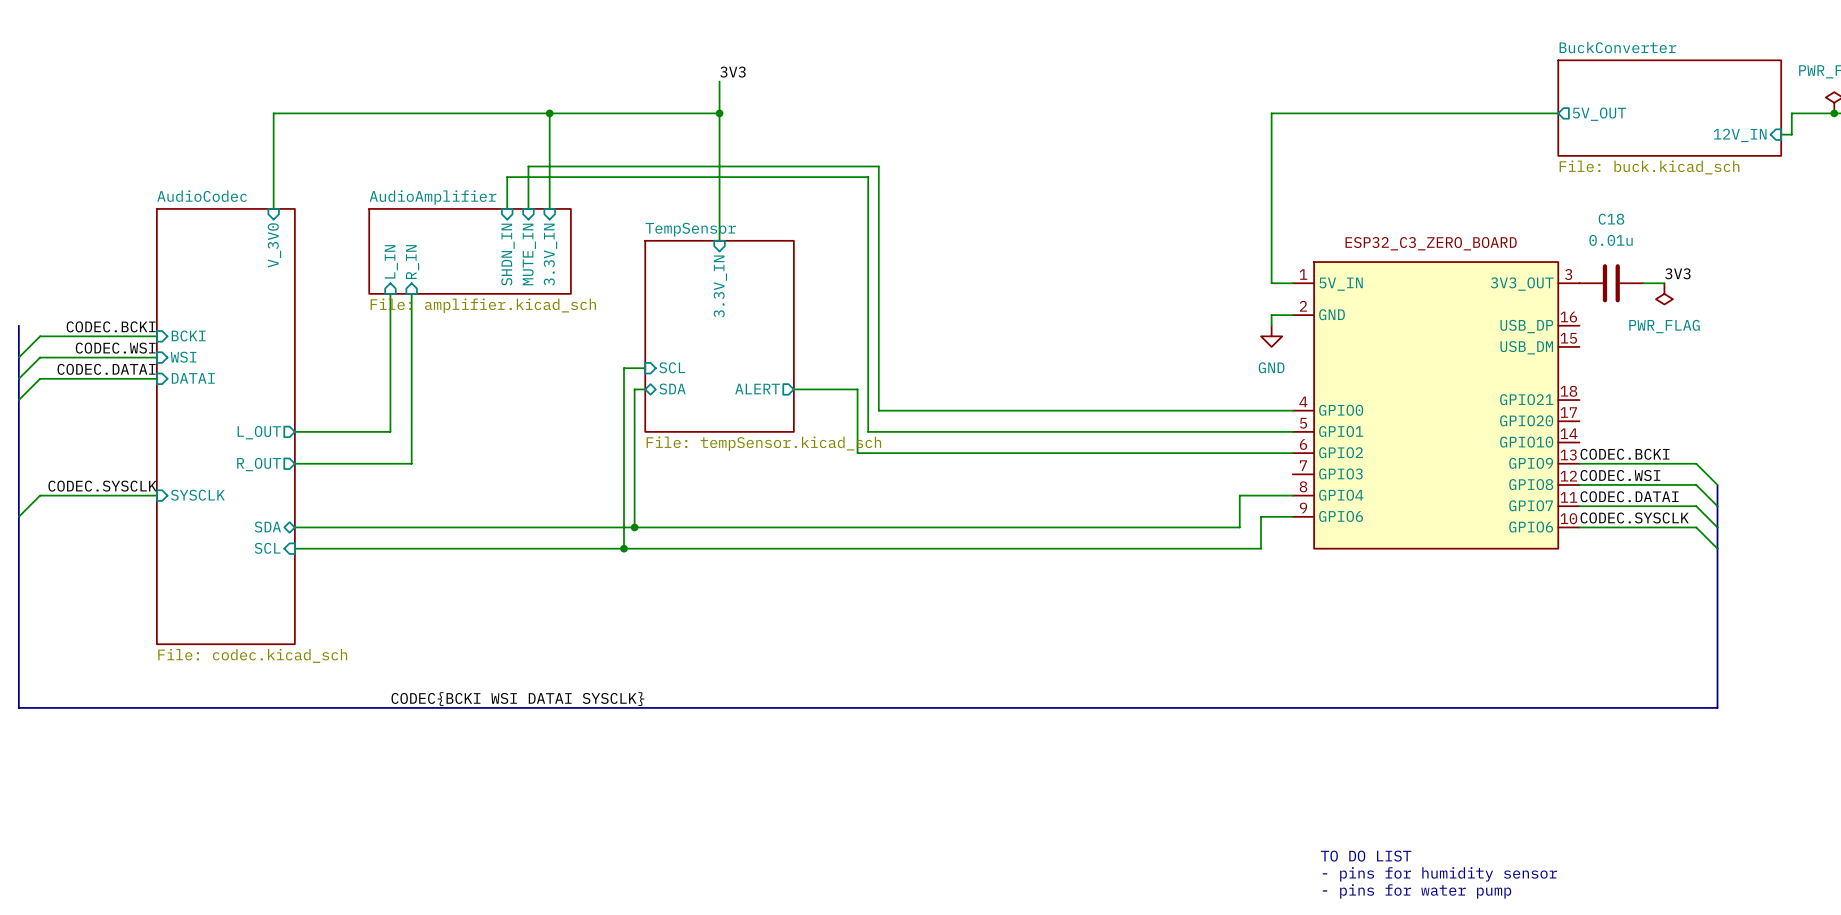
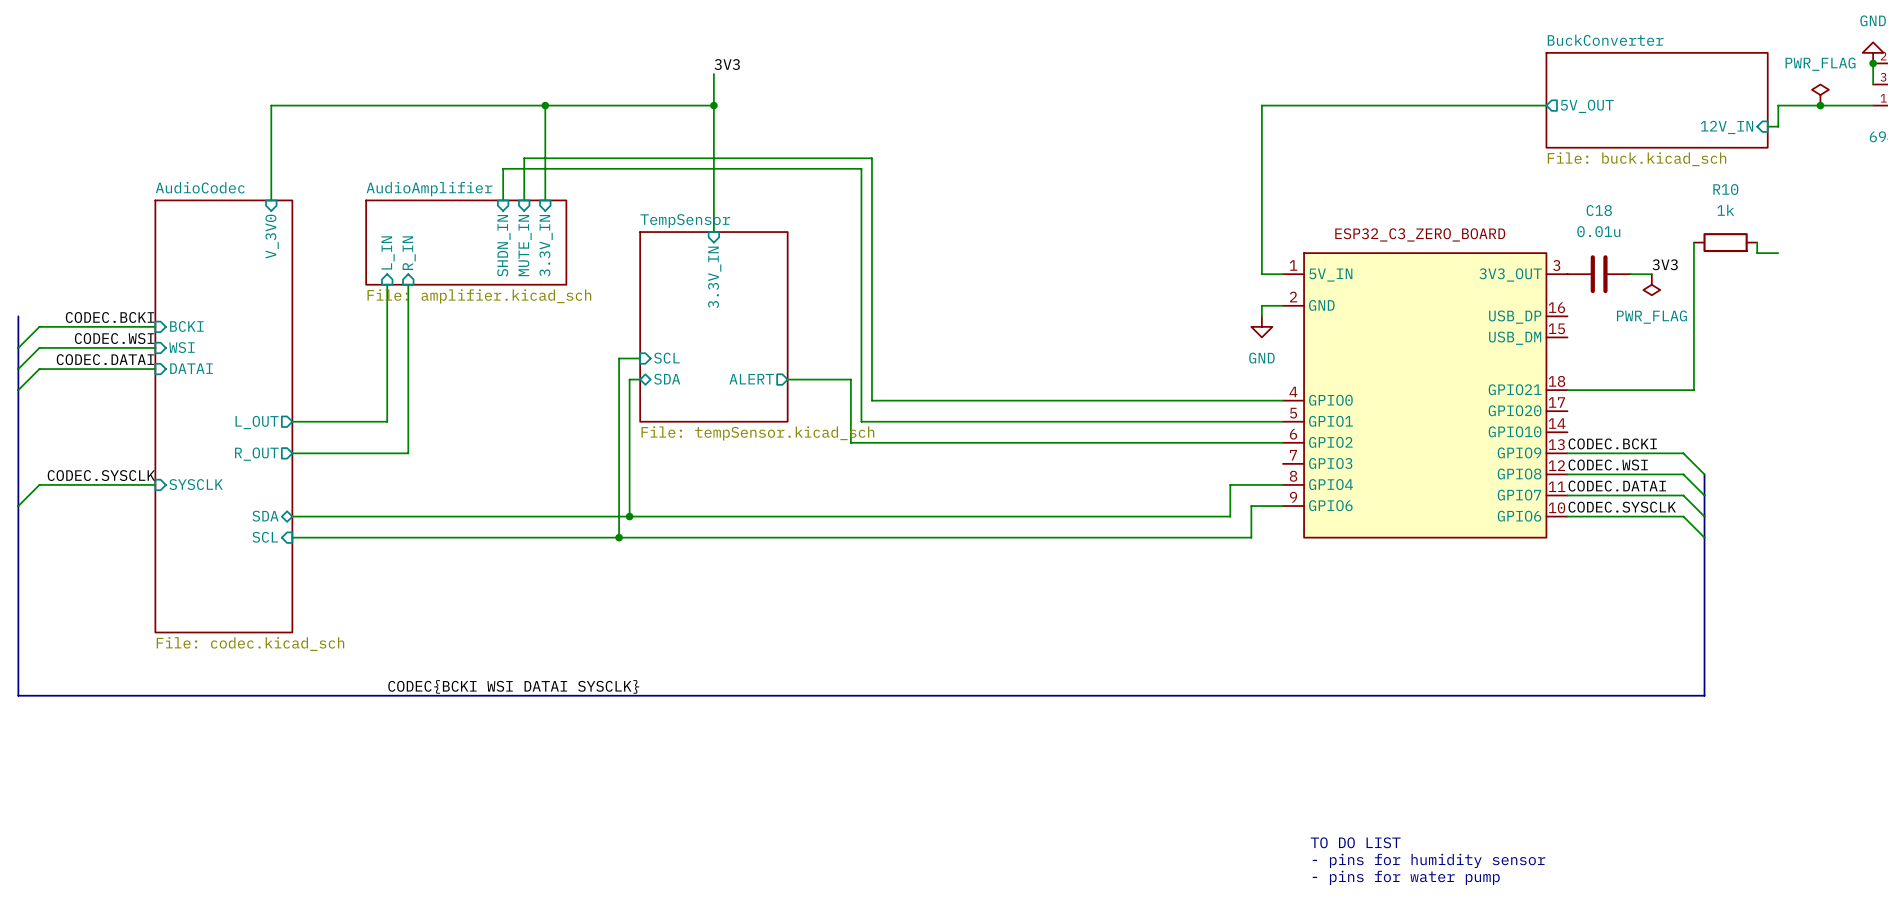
wire: none -> (1693, 242) (1693, 390) (1567, 390)
R10: none -> 1k (1725, 242)
wire: none -> (1757, 242) (1757, 253) (1778, 253)

